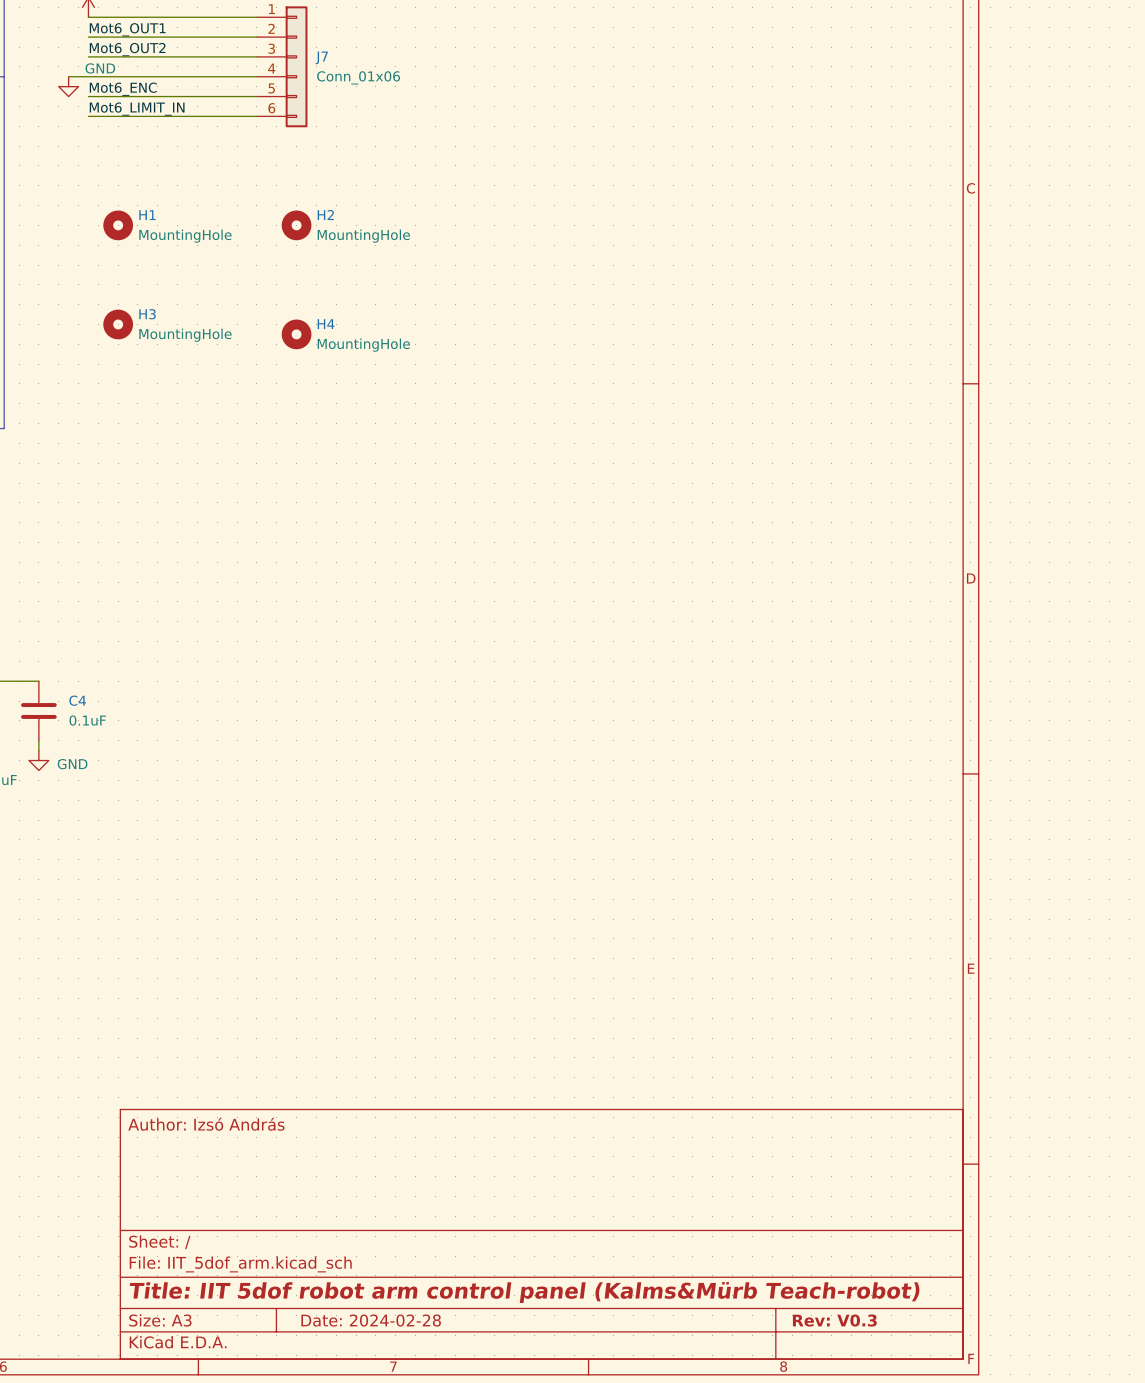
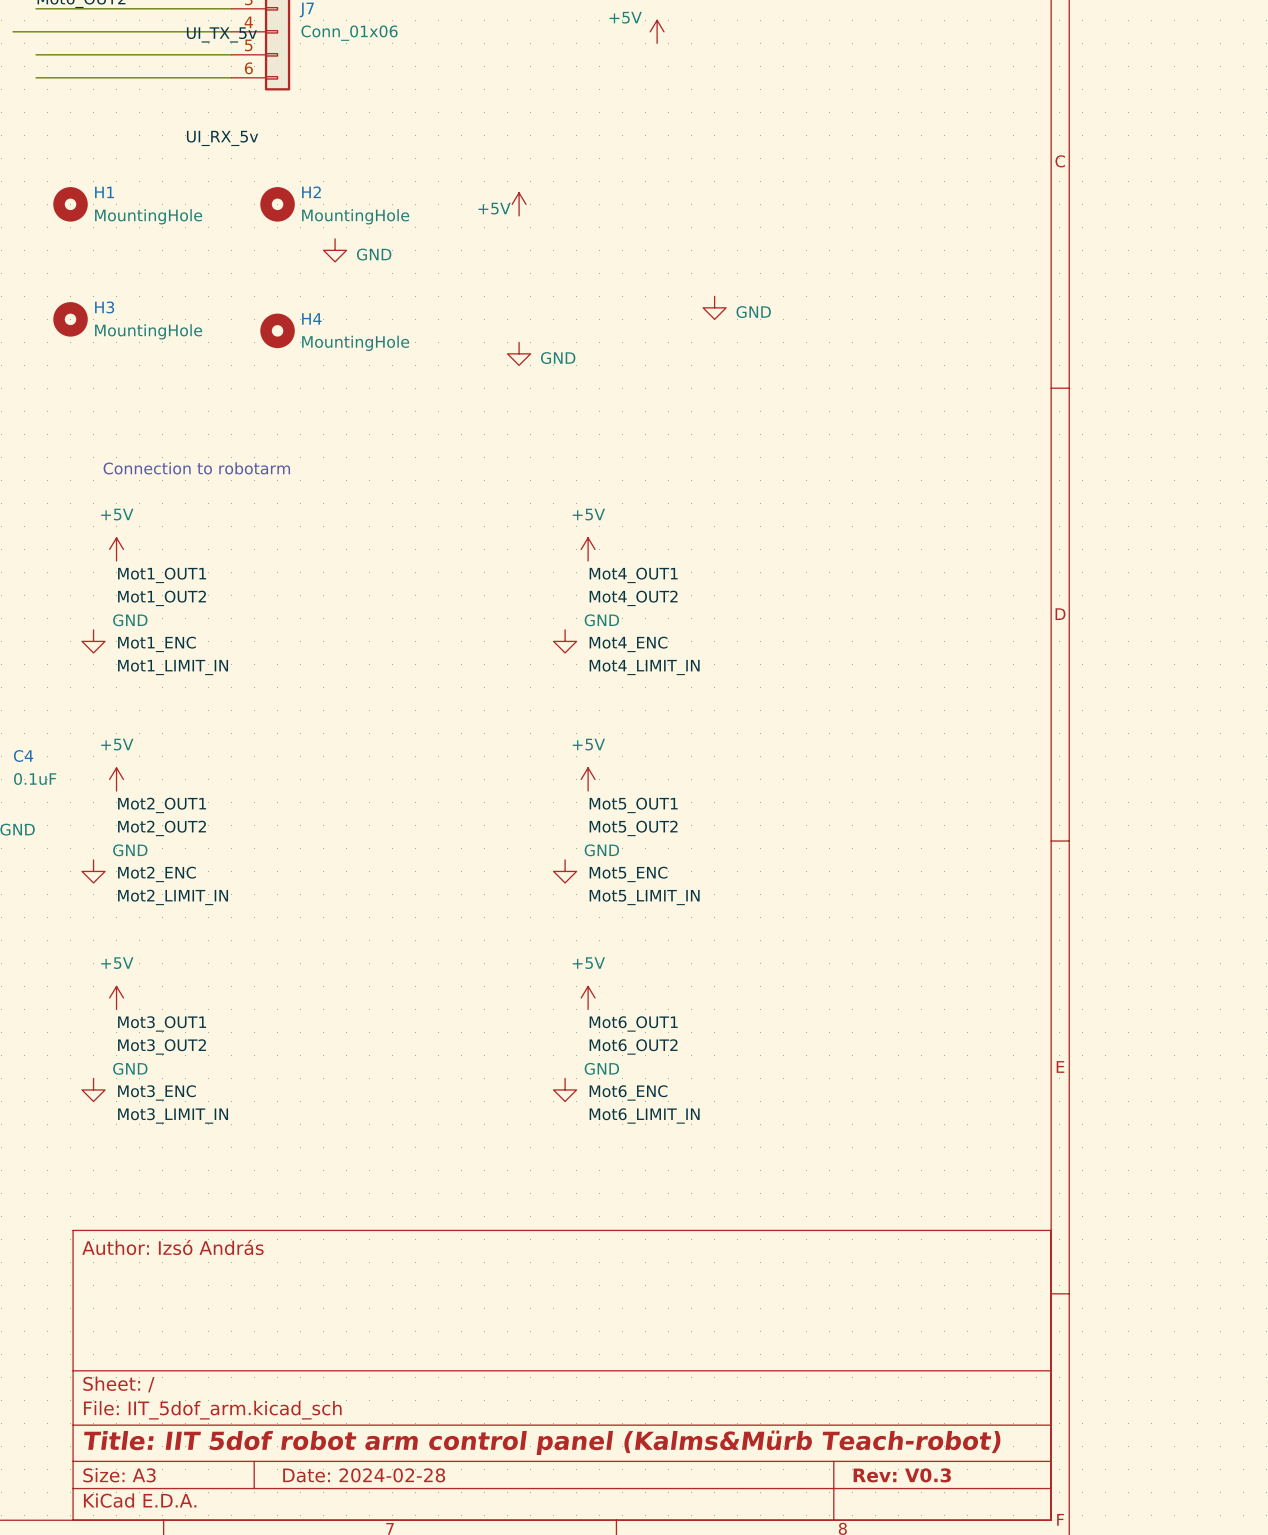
power symbol: none -> +5V (657, 31)
label: none -> UI_TX_5v (221, 34)
power symbol: GND (68, 86) -> none
label: Mot6_ENC (123, 89) -> none
label: Mot6_LIMIT_IN (137, 109) -> none
label: none -> UI_RX_5v (222, 138)
power symbol: none -> +5V (519, 204)
power symbol: none -> GND (335, 250)
power symbol: none -> GND (714, 307)
power symbol: none -> GND (519, 353)
text: none -> Connection to robotarm (196, 468)
power symbol: none -> +5V (116, 549)
power symbol: none -> +5V (588, 549)
label: none -> Mot1_OUT1 (162, 575)
label: none -> Mot4_OUT1 (633, 575)
label: none -> Mot1_OUT2 (162, 598)
label: none -> Mot4_OUT2 (633, 598)
power symbol: none -> GND (93, 641)
power symbol: none -> GND (565, 641)
label: none -> Mot1_ENC (156, 644)
label: none -> Mot4_ENC (628, 644)
label: none -> Mot1_LIMIT_IN (173, 667)
label: none -> Mot4_LIMIT_IN (644, 667)
power symbol: none -> +5V (116, 779)
power symbol: none -> +5V (588, 779)
label: none -> Mot2_OUT1 (162, 805)
label: none -> Mot5_OUT1 (633, 805)
label: none -> Mot2_OUT2 (162, 828)
label: none -> Mot5_OUT2 (633, 828)
power symbol: none -> GND (93, 871)
power symbol: none -> GND (565, 871)
label: none -> Mot2_ENC (156, 874)
label: none -> Mot5_ENC (628, 874)
label: none -> Mot2_LIMIT_IN (173, 897)
label: none -> Mot5_LIMIT_IN (644, 897)
power symbol: none -> +5V (116, 997)
power symbol: none -> +5V (588, 997)
label: none -> Mot3_OUT1 (162, 1023)
label: none -> Mot6_OUT1 (633, 1023)
label: none -> Mot3_OUT2 (162, 1046)
label: none -> Mot6_OUT2 (633, 1046)
power symbol: none -> GND (93, 1089)
power symbol: none -> GND (565, 1089)
label: none -> Mot3_ENC (156, 1092)
label: none -> Mot6_ENC (628, 1092)
label: none -> Mot3_LIMIT_IN (173, 1115)
label: none -> Mot6_LIMIT_IN (644, 1115)

